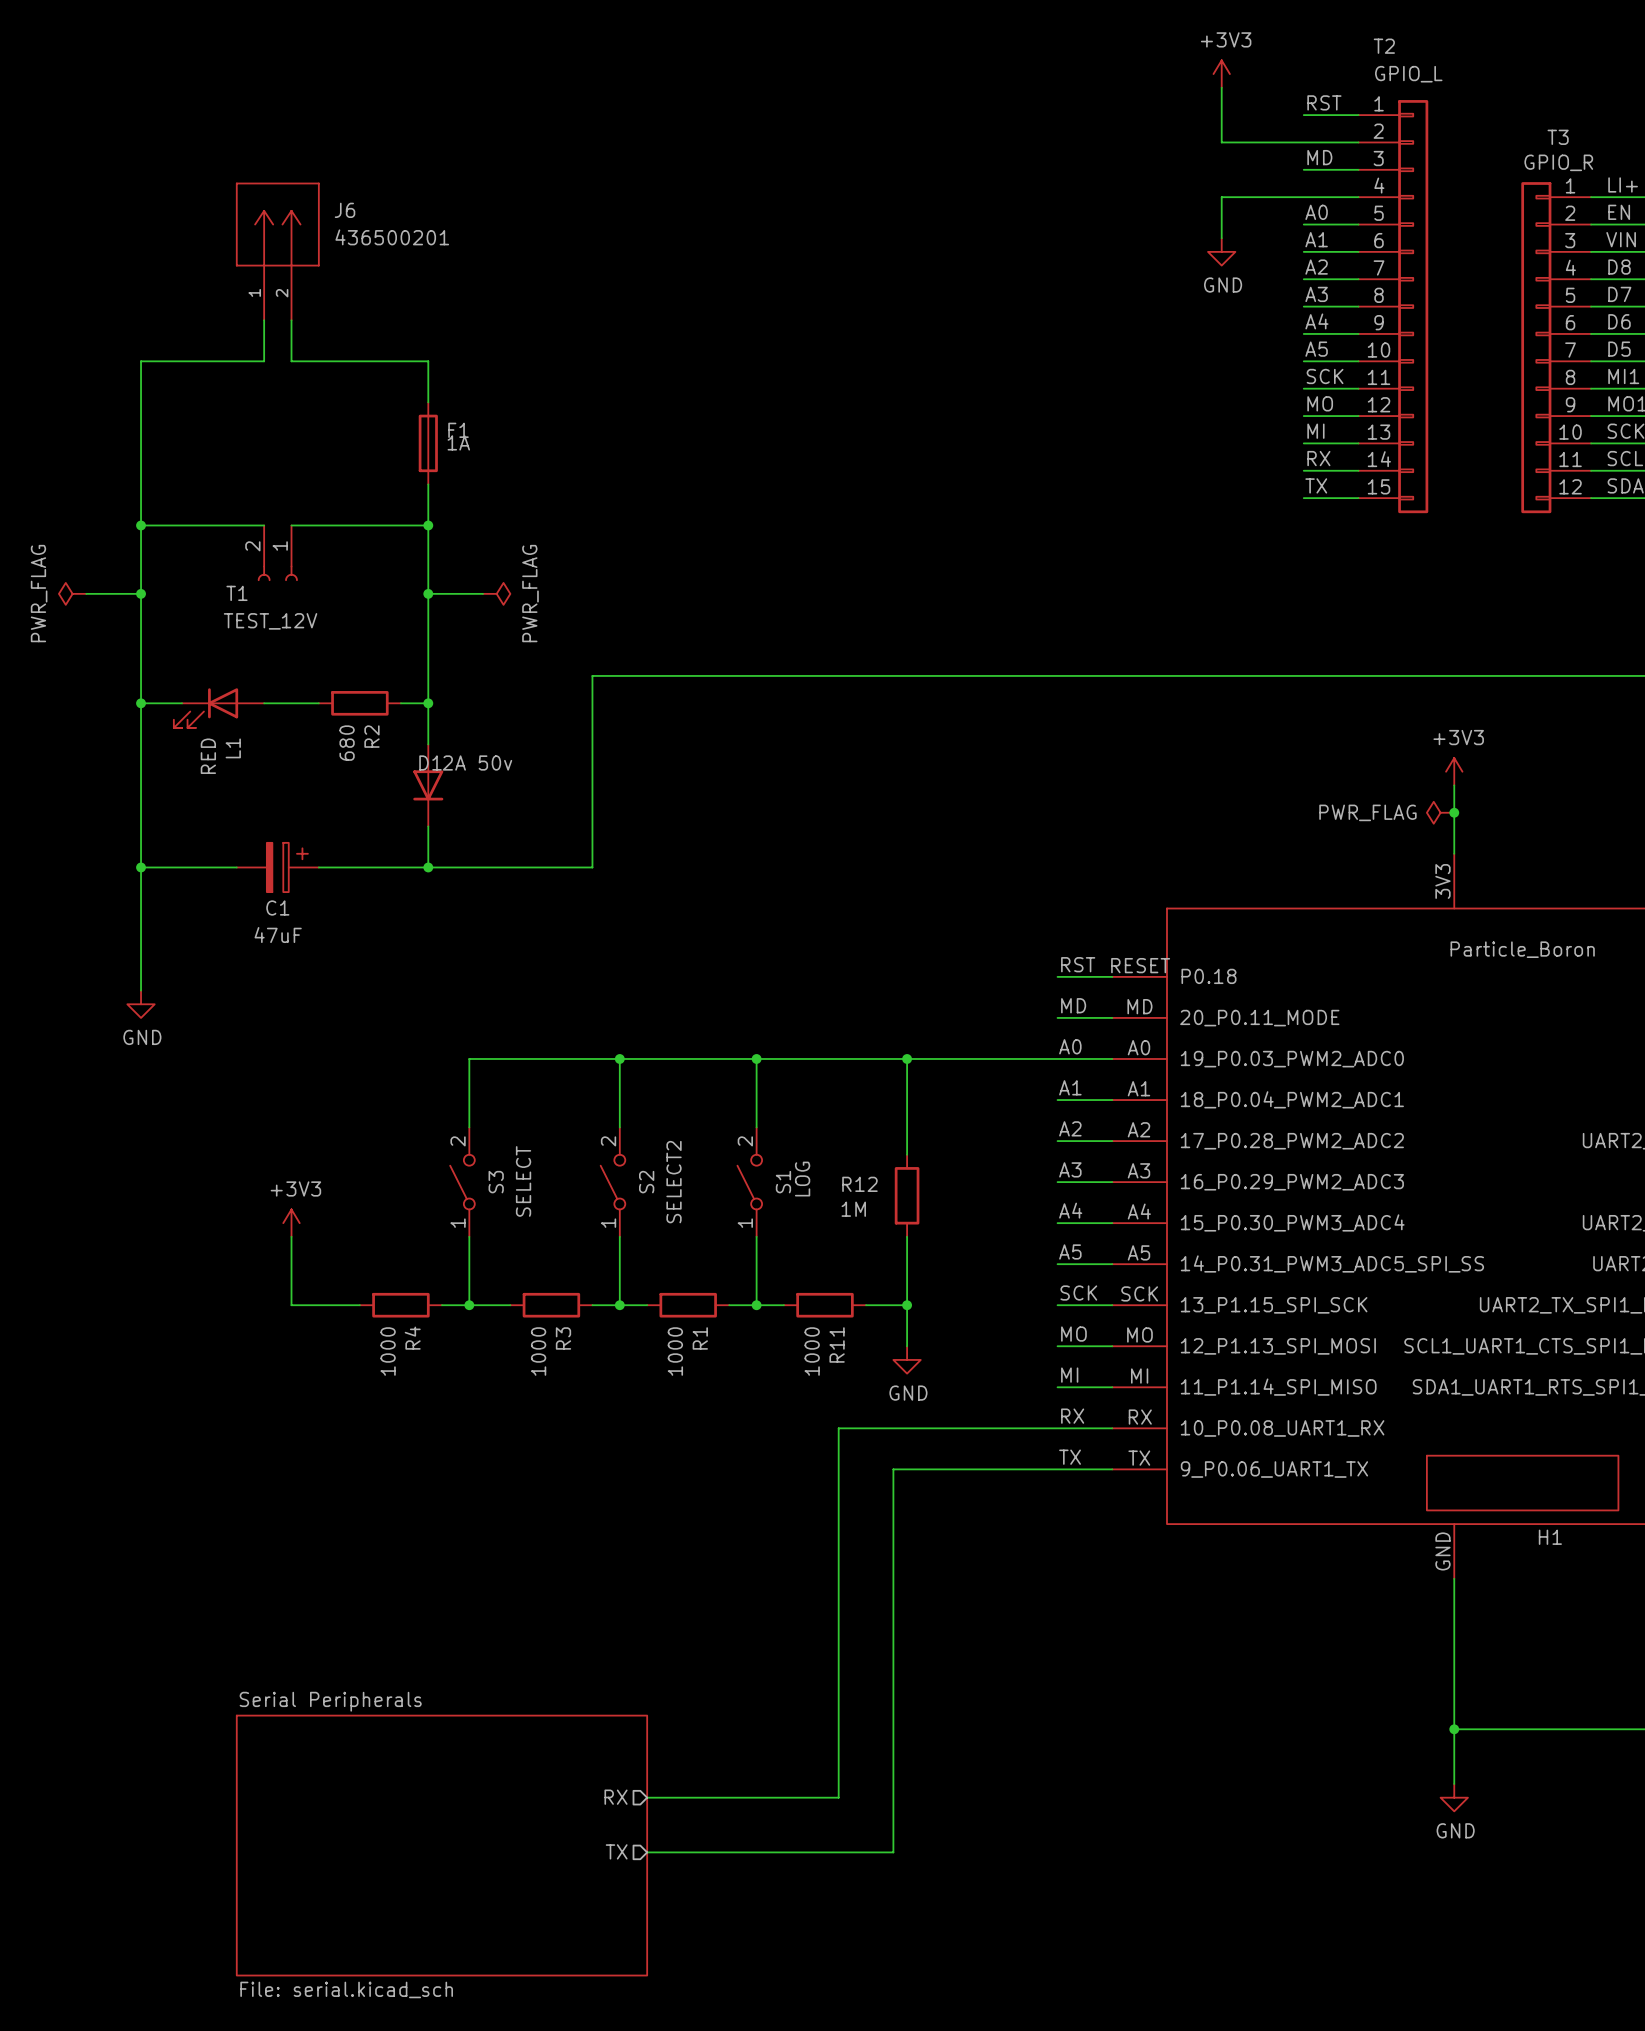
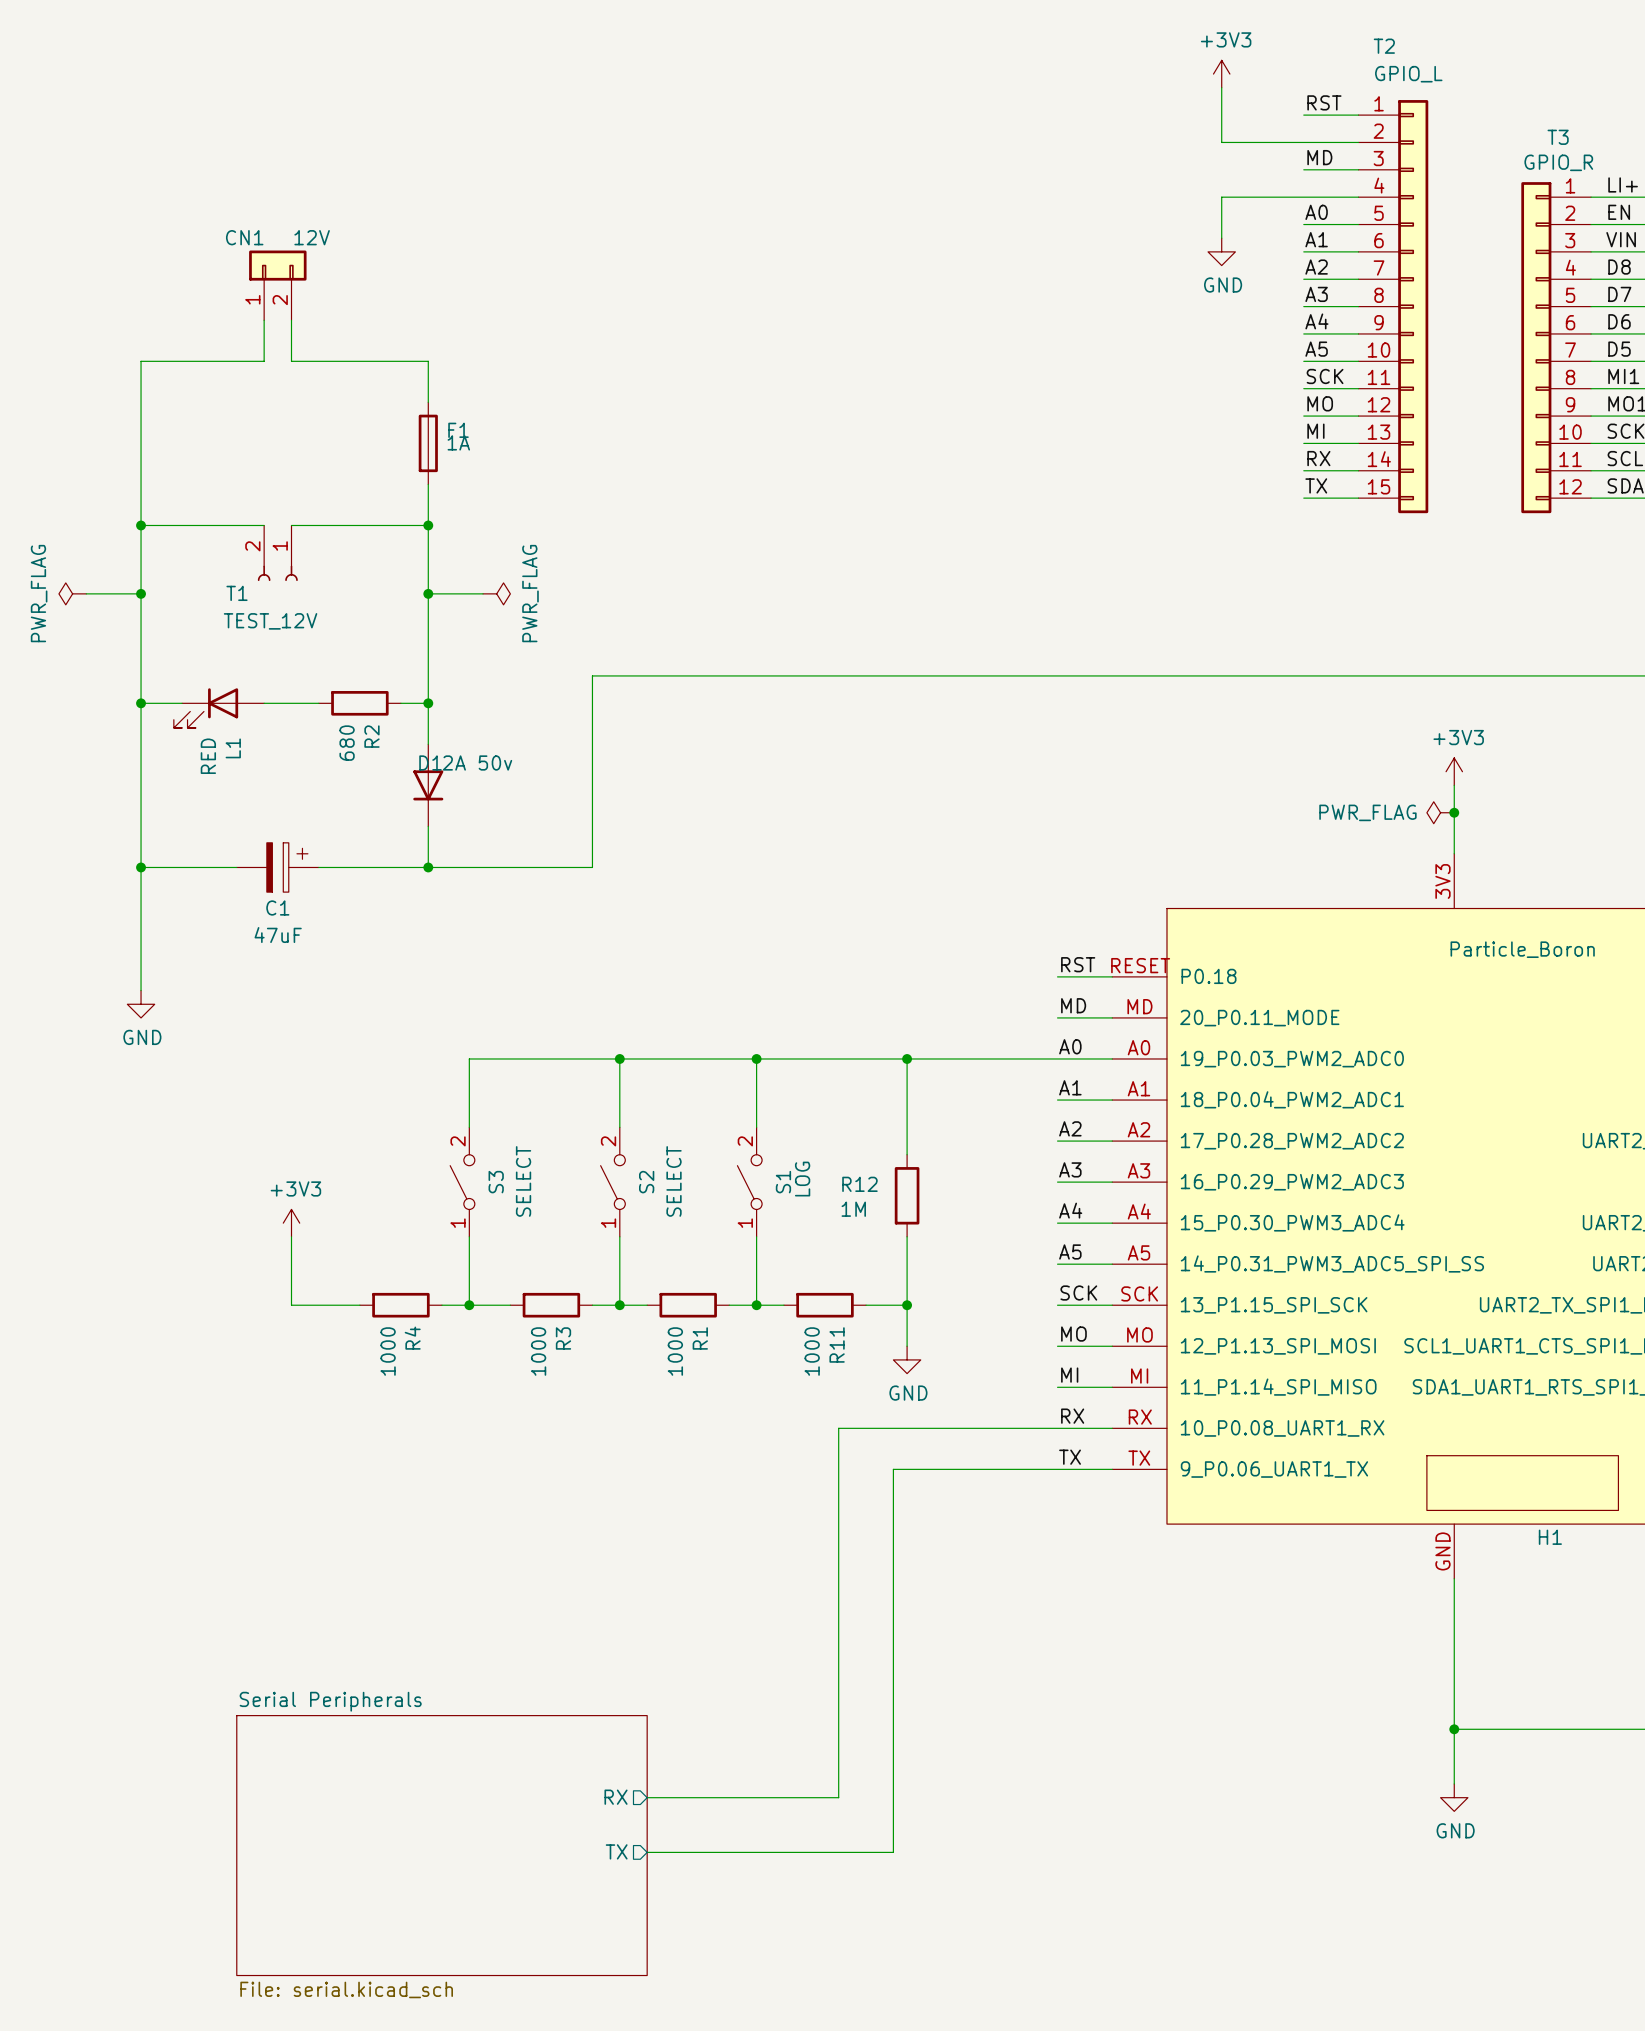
J6: 436500201 (277, 251) -> none
CN1: none -> 12V (277, 285)
S2 value: SELECT2 (674, 1182) -> SELECT (674, 1181)

